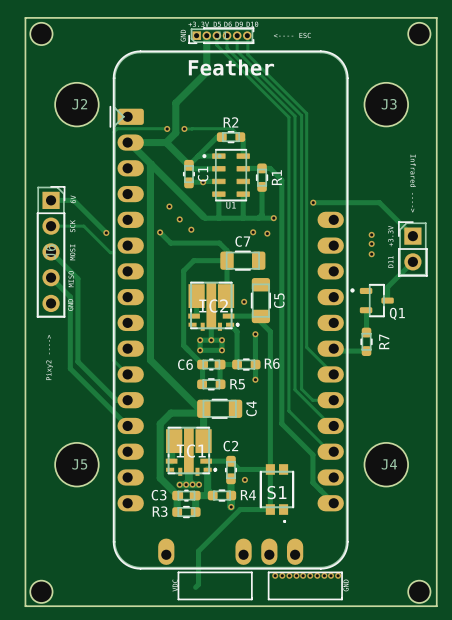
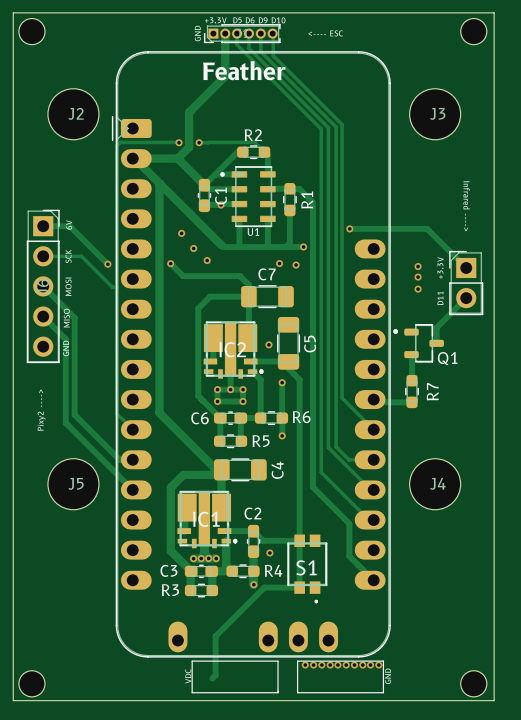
J5 position: (76, 464) -> (73, 484)
J4 position: (386, 464) -> (435, 484)

